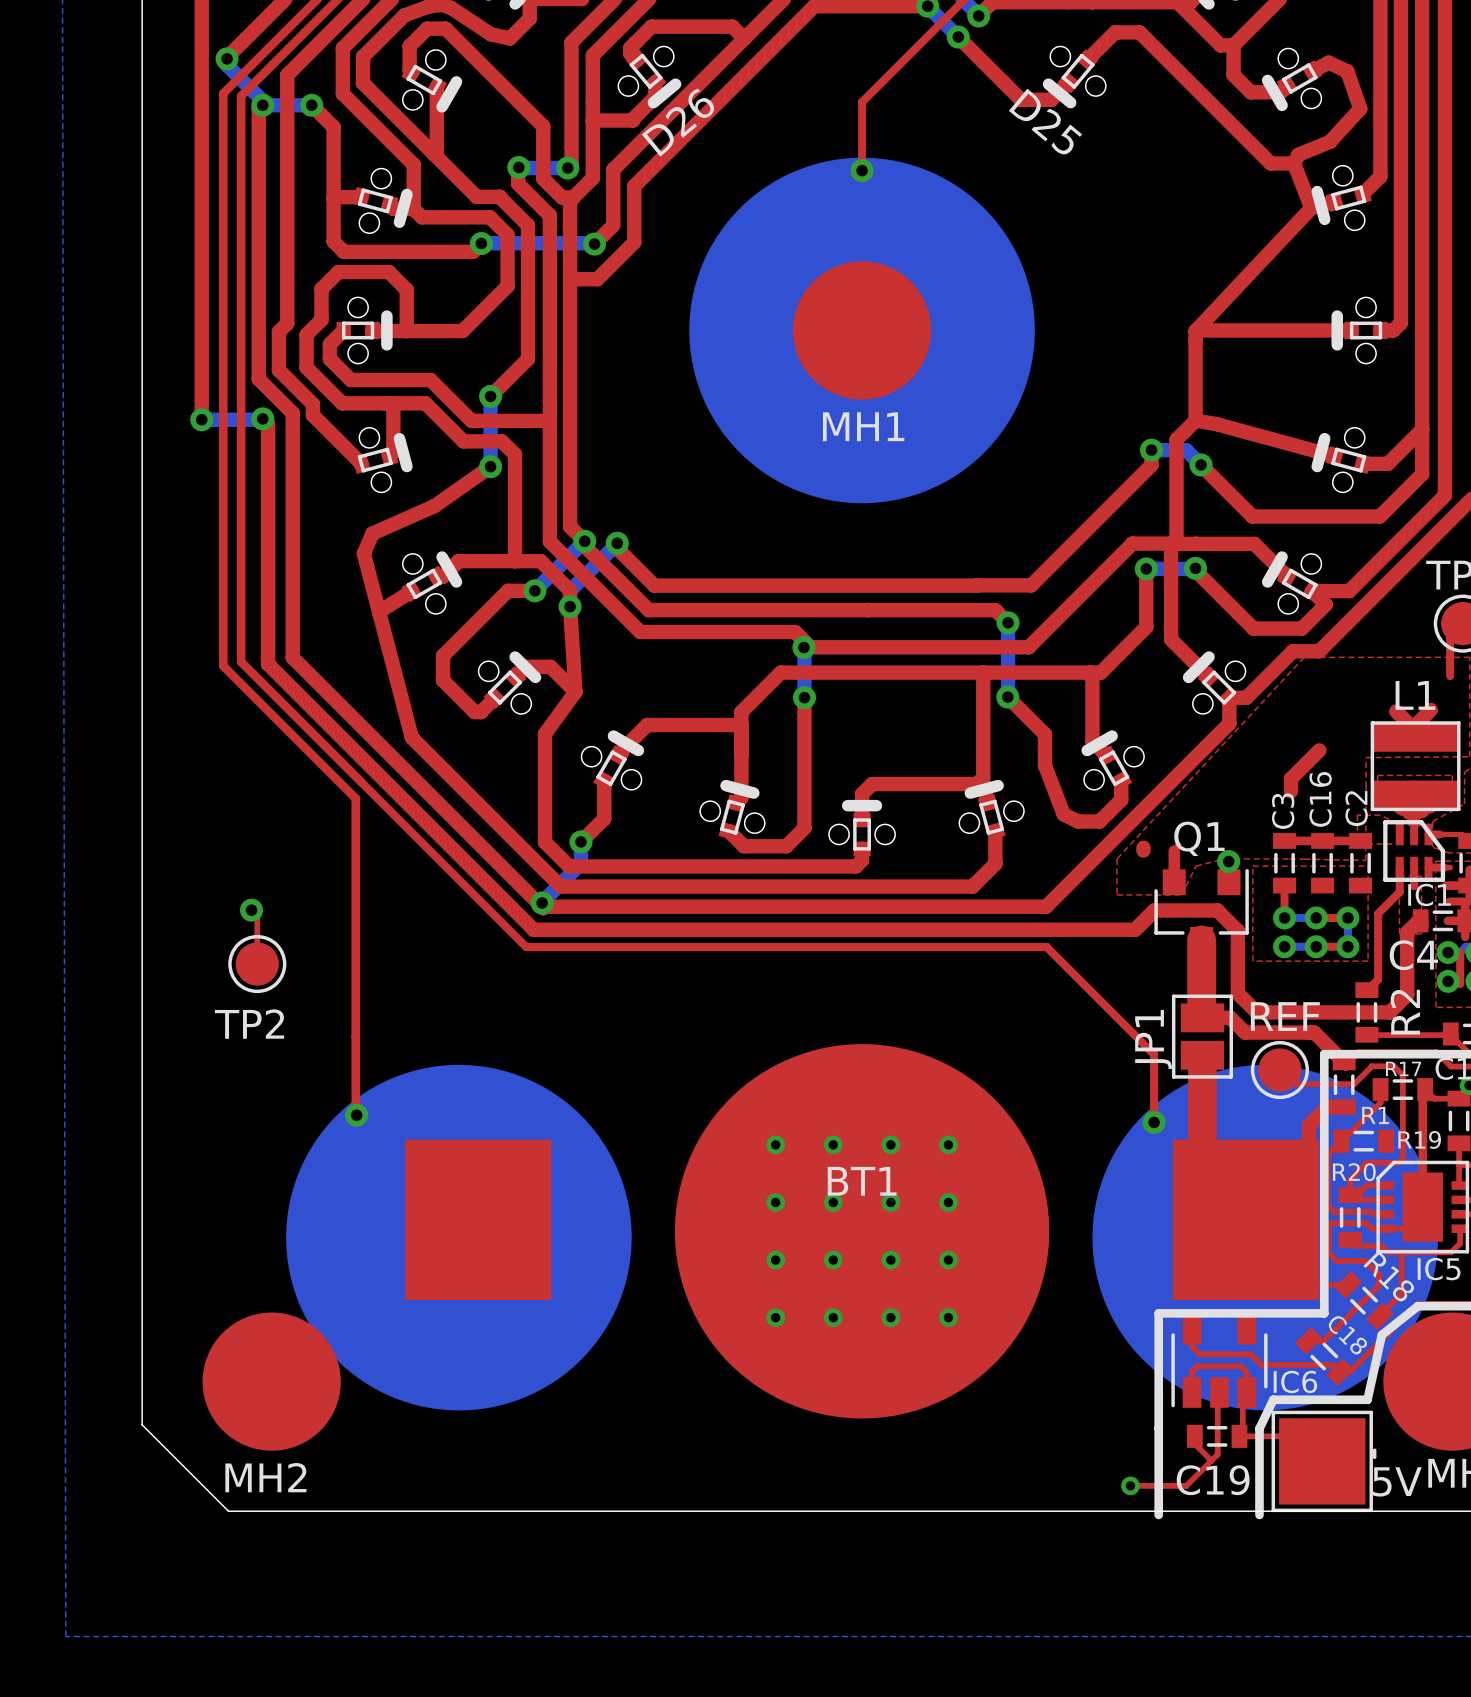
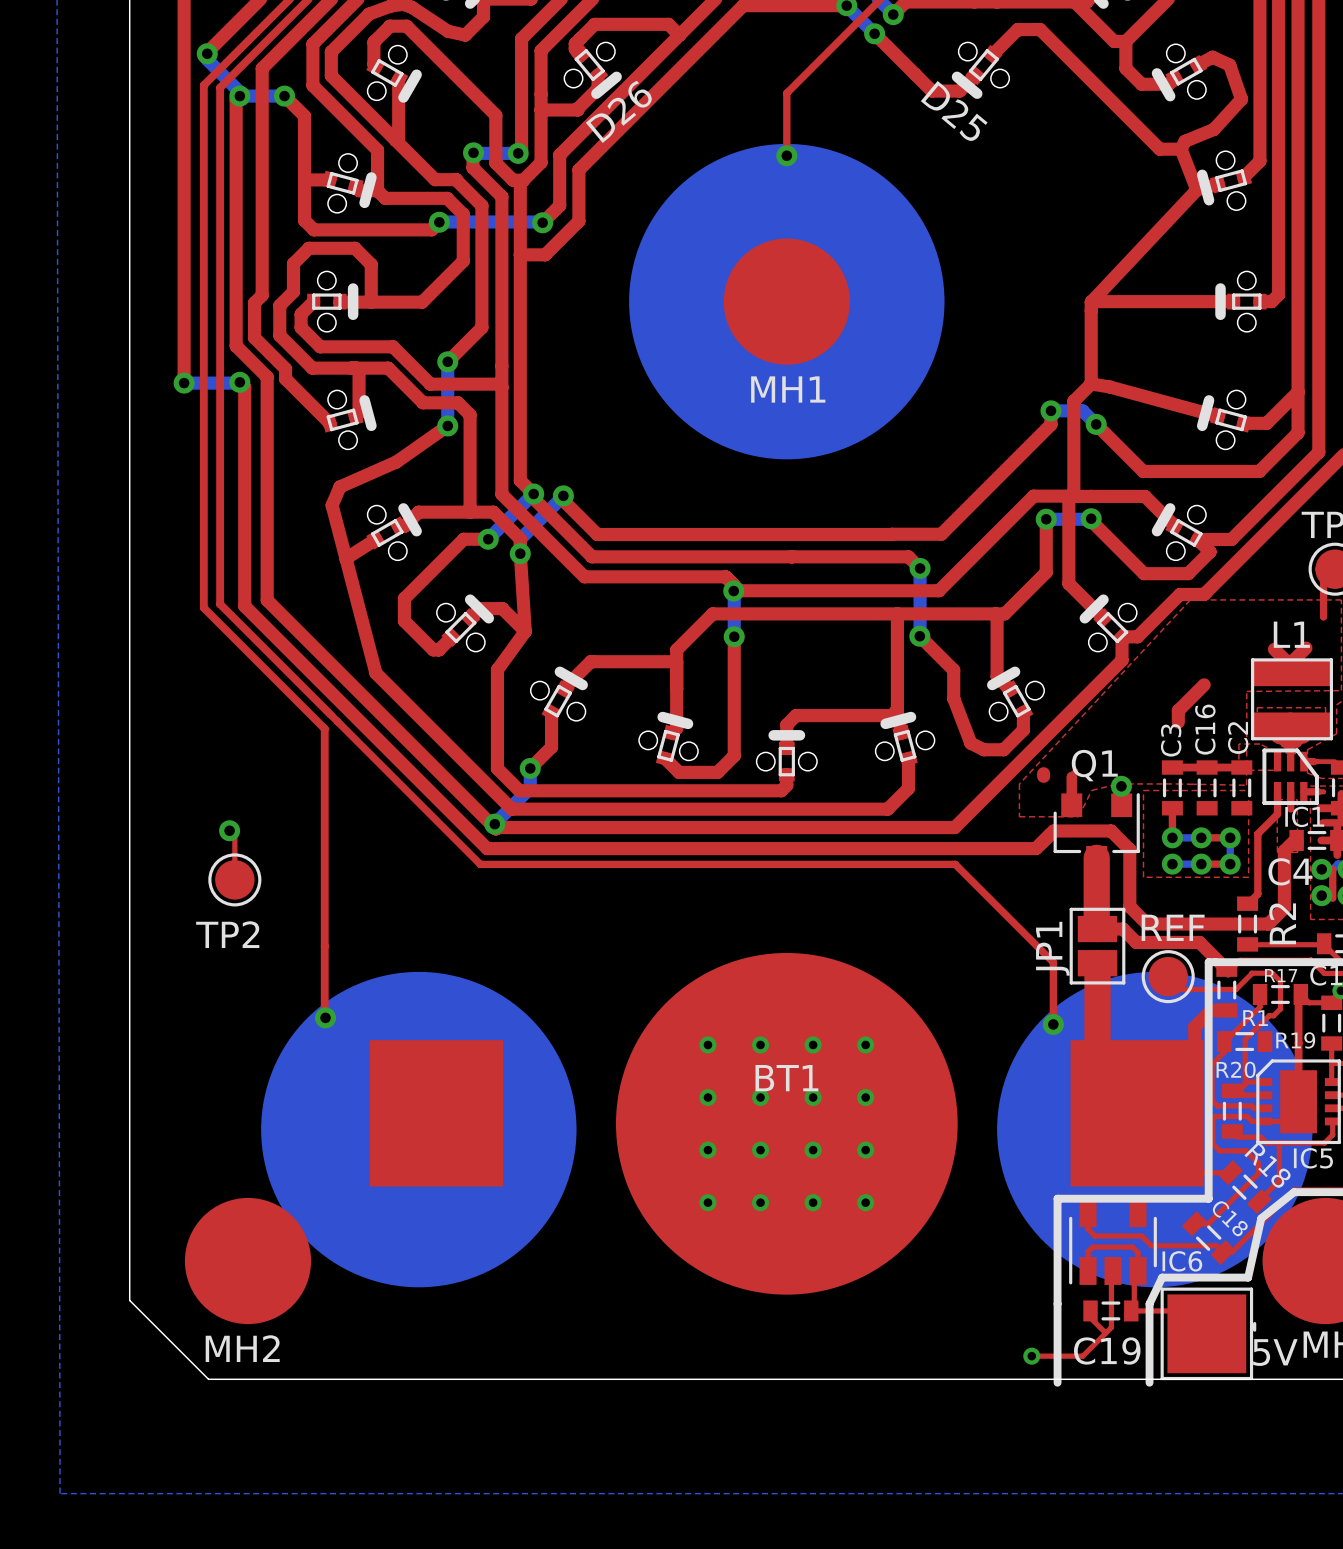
top track: (1380, 1102) (1328, 1154) (1328, 1166) -> (1260, 1006) (1224, 1042)
top track: (1402, 1105) (1402, 1158) (1398, 1162) (1366, 1162) (1350, 1179) (1350, 1195) -> (1280, 1008) (1273, 1015) (1269, 1015) (1245, 1039) (1245, 1084)
top track: none -> (1224, 1050) (1212, 1064)

